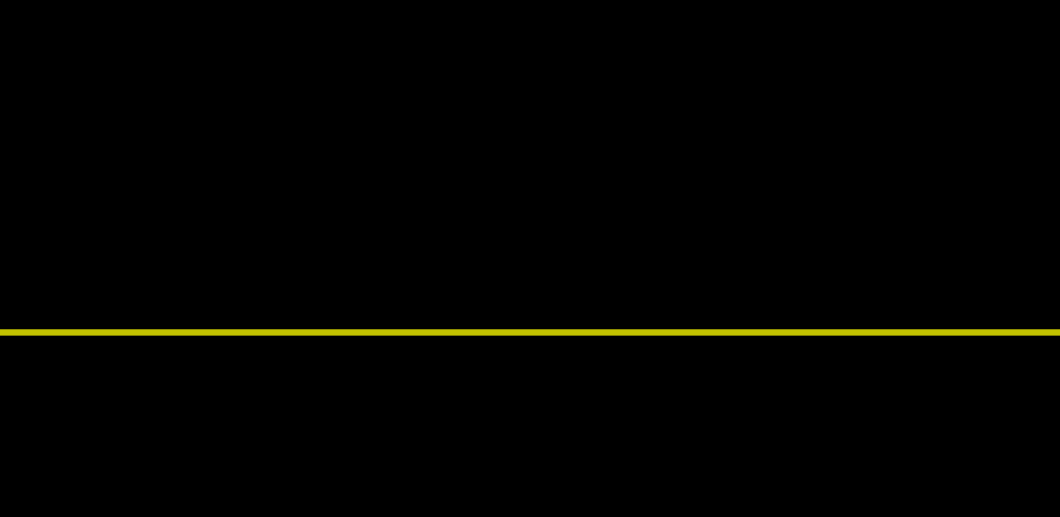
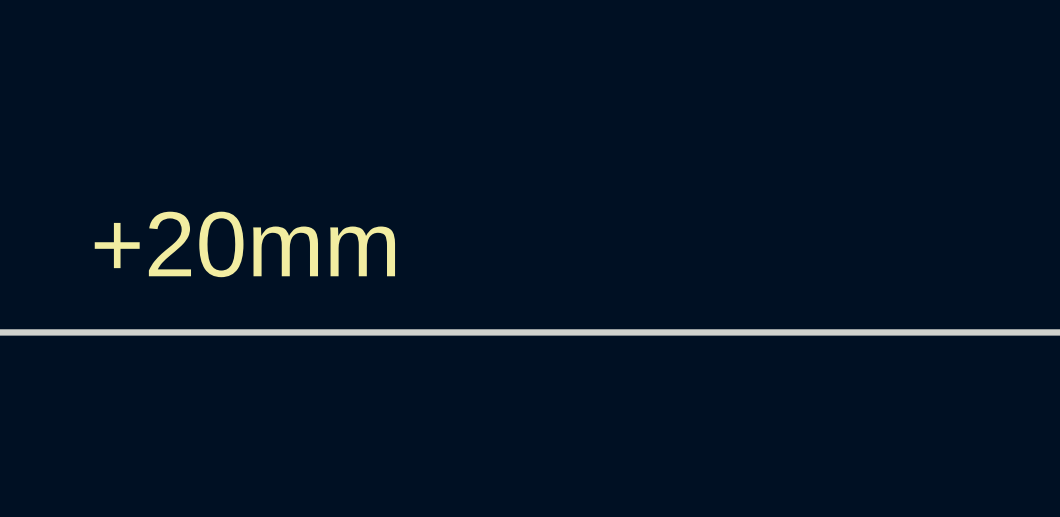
text: none -> +20mm (244, 244)

